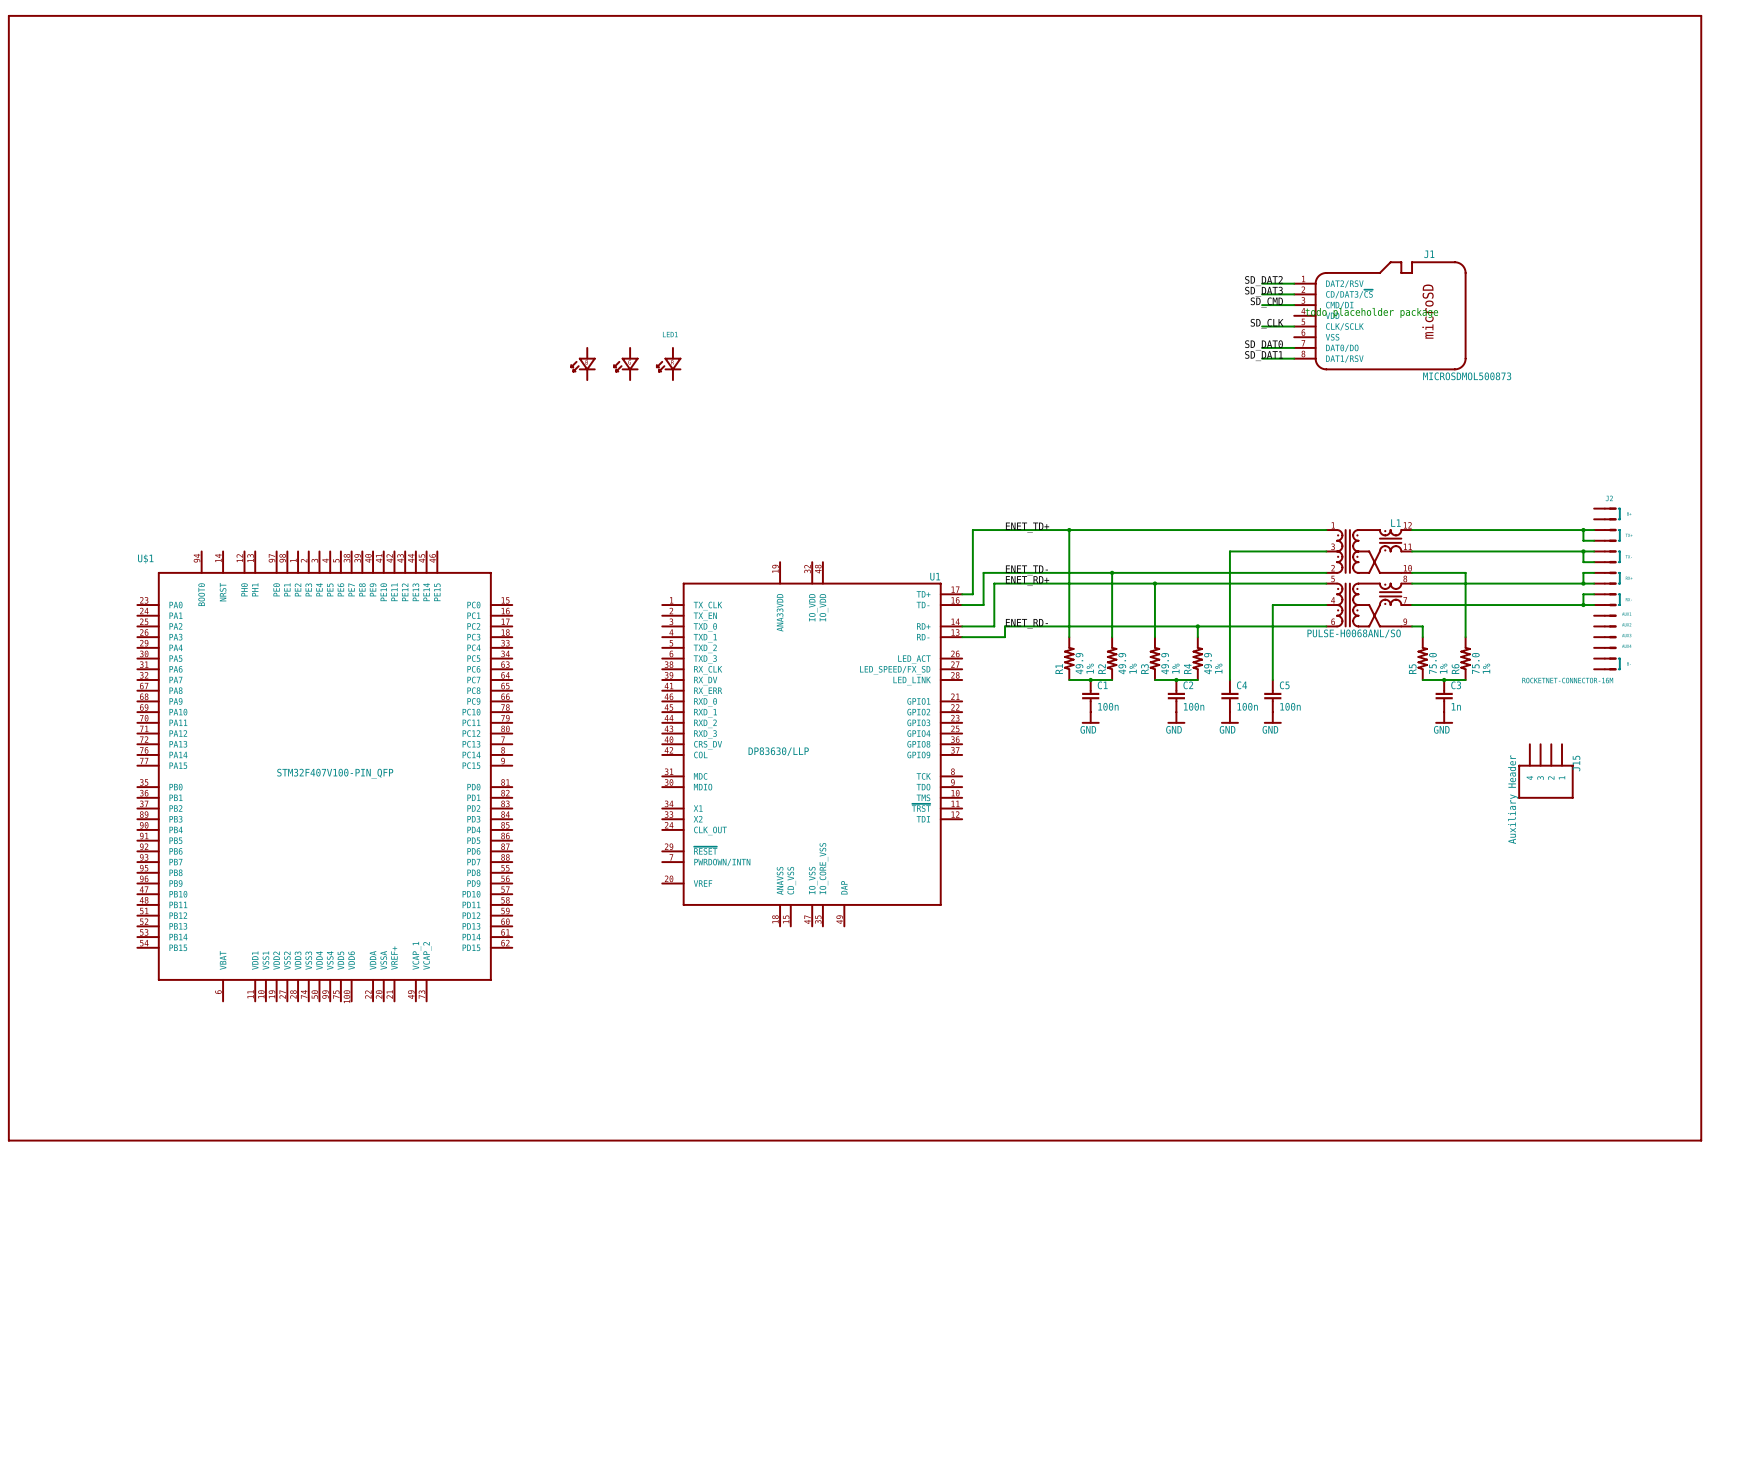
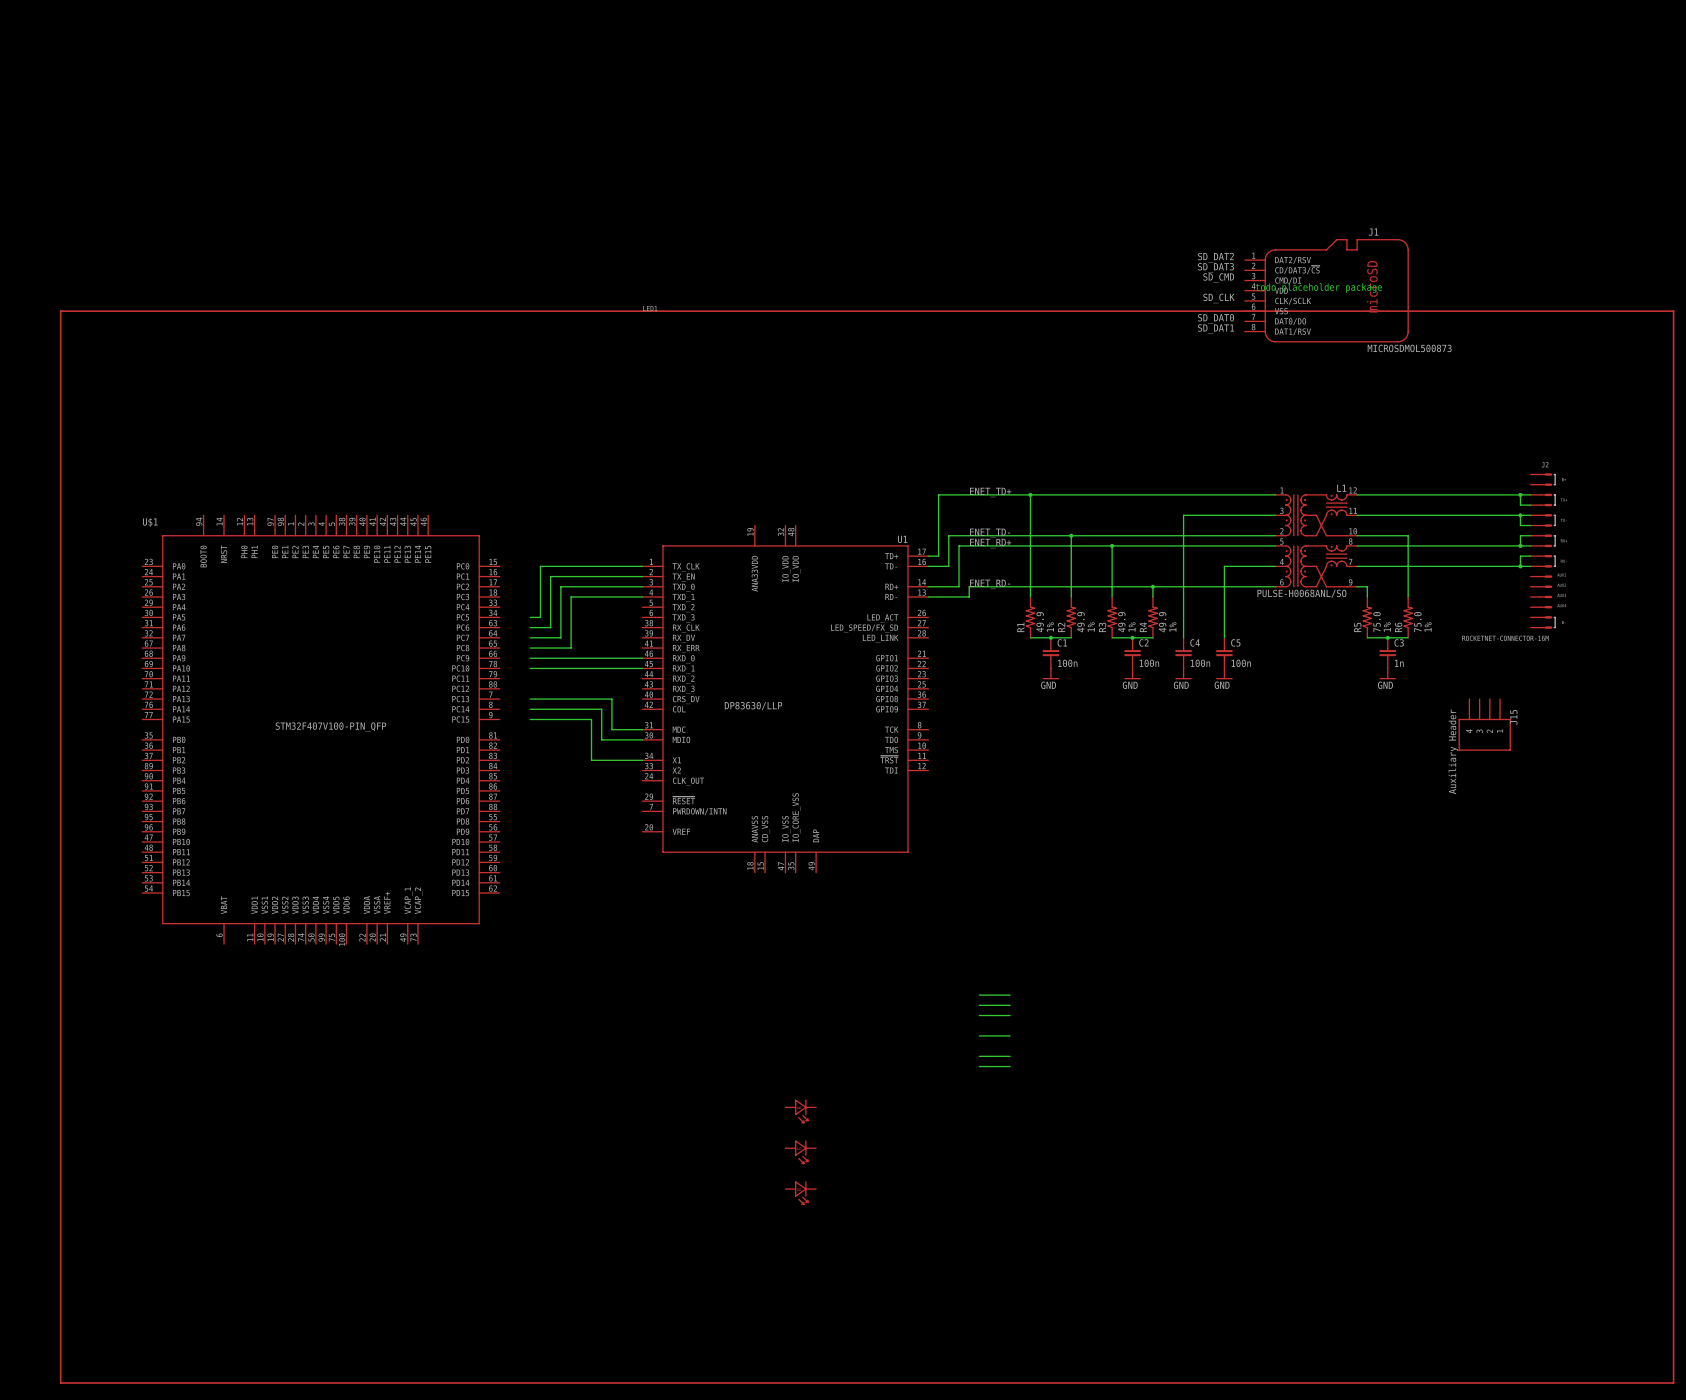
wire: (1262, 283) (1294, 283) -> none
wire: (1262, 294) (1294, 294) -> none
wire: (1262, 305) (1294, 305) -> none
wire: (1262, 326) (1294, 326) -> none
wire: (1262, 347) (1294, 347) -> none
wire: (1262, 358) (1294, 358) -> none
part: (582, 364) -> none
part: (625, 364) -> none
part: (668, 364) -> none
part: (855, 578) -> none
wire: none -> (642, 566) (540, 566) (540, 617) (530, 617)
wire: none -> (642, 576) (550, 576) (550, 627) (530, 627)
wire: none -> (642, 586) (560, 586) (560, 637) (530, 637)
wire: none -> (642, 596) (571, 596) (571, 648) (530, 648)
wire: none -> (530, 658) (642, 658)
wire: none -> (530, 668) (642, 668)
wire: none -> (530, 699) (611, 699) (611, 729) (642, 729)
wire: none -> (530, 709) (601, 709) (601, 739) (642, 739)
wire: none -> (530, 719) (591, 719) (591, 760) (642, 760)
part: none -> (867, 847)
wire: none -> (979, 995) (1010, 995)
wire: none -> (979, 1005) (1010, 1005)
wire: none -> (979, 1015) (1010, 1015)
wire: none -> (979, 1035) (1010, 1035)
wire: none -> (979, 1056) (1010, 1056)
wire: none -> (979, 1066) (1010, 1066)
part: none -> (800, 1111)
part: none -> (800, 1152)
part: none -> (800, 1193)

